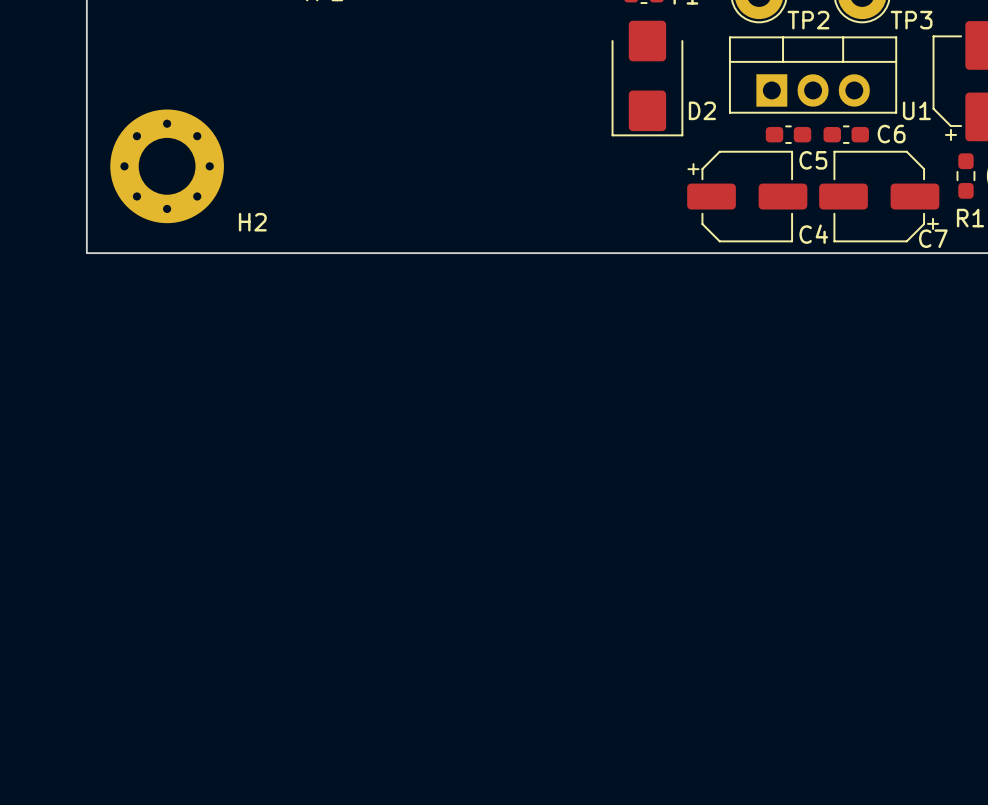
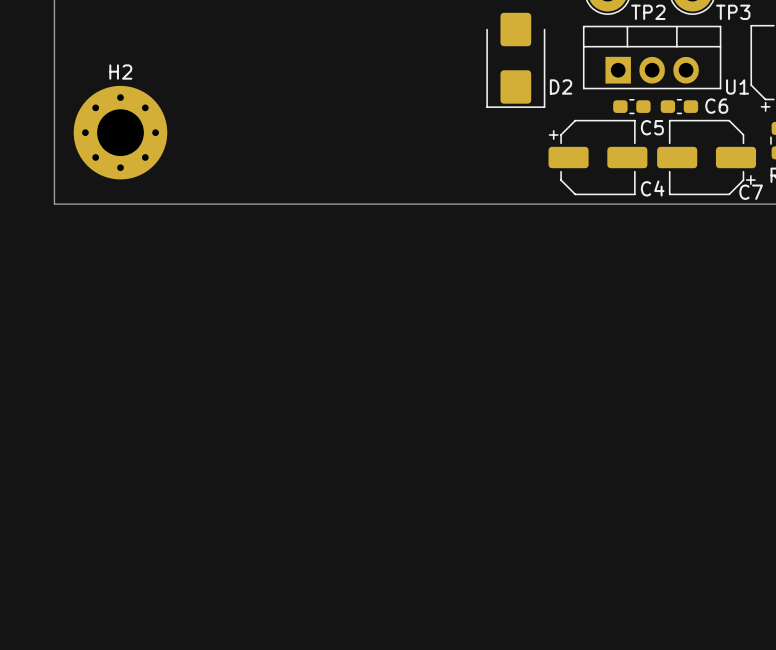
H2 name position: H2 (252, 222) -> H2 (120, 72)

